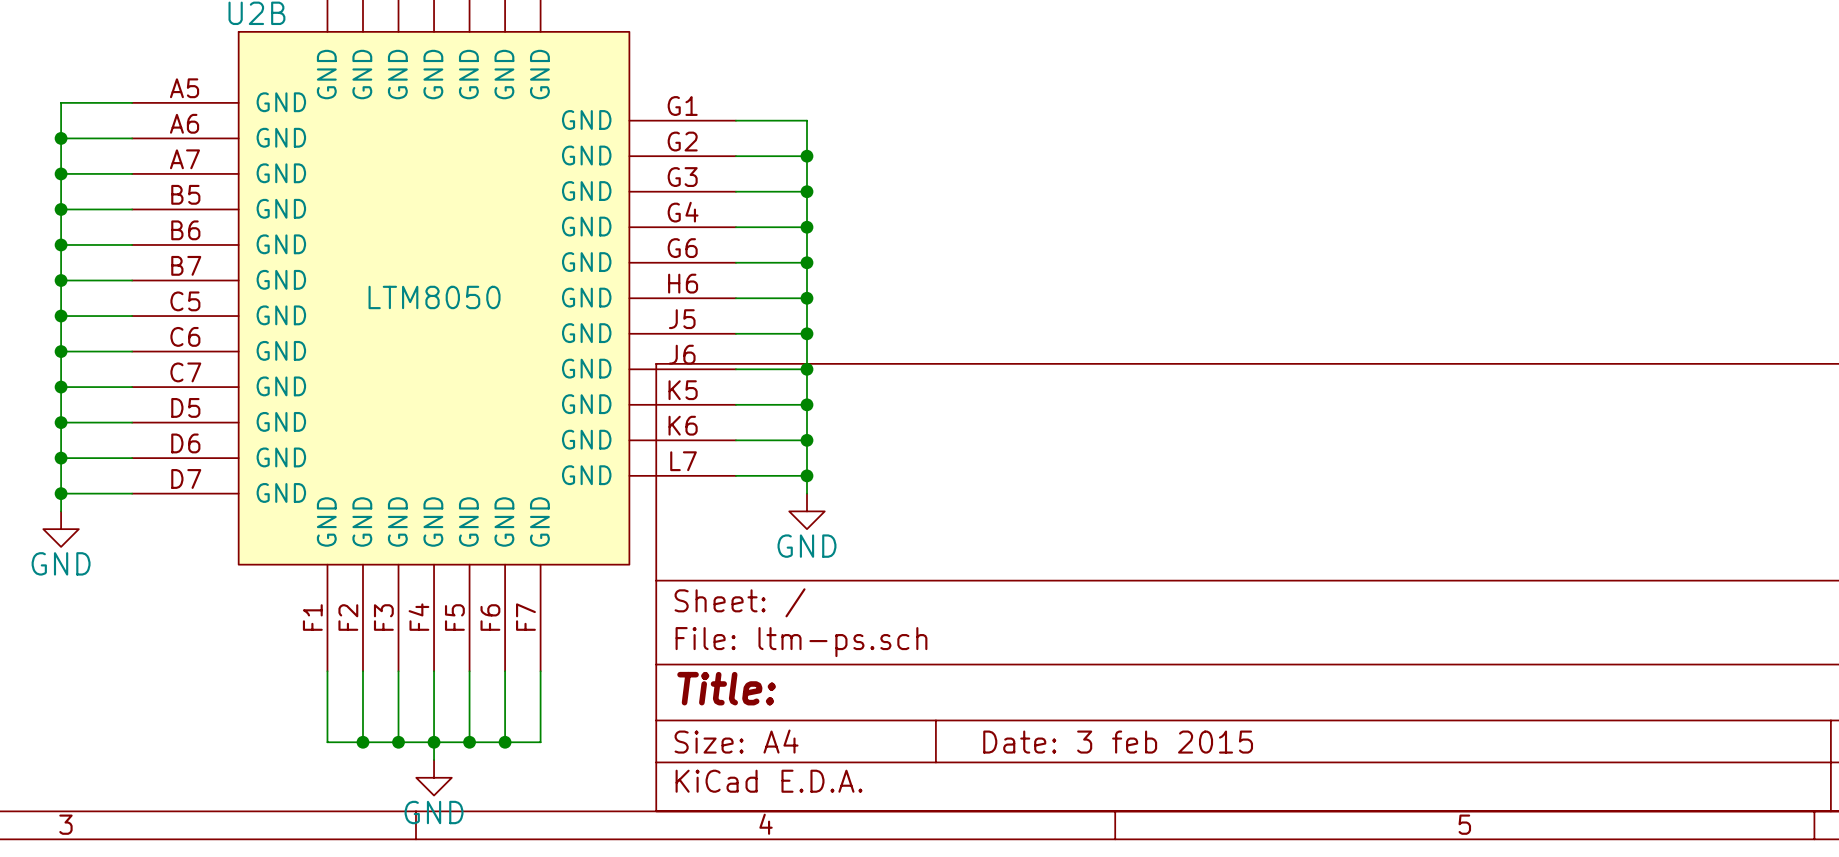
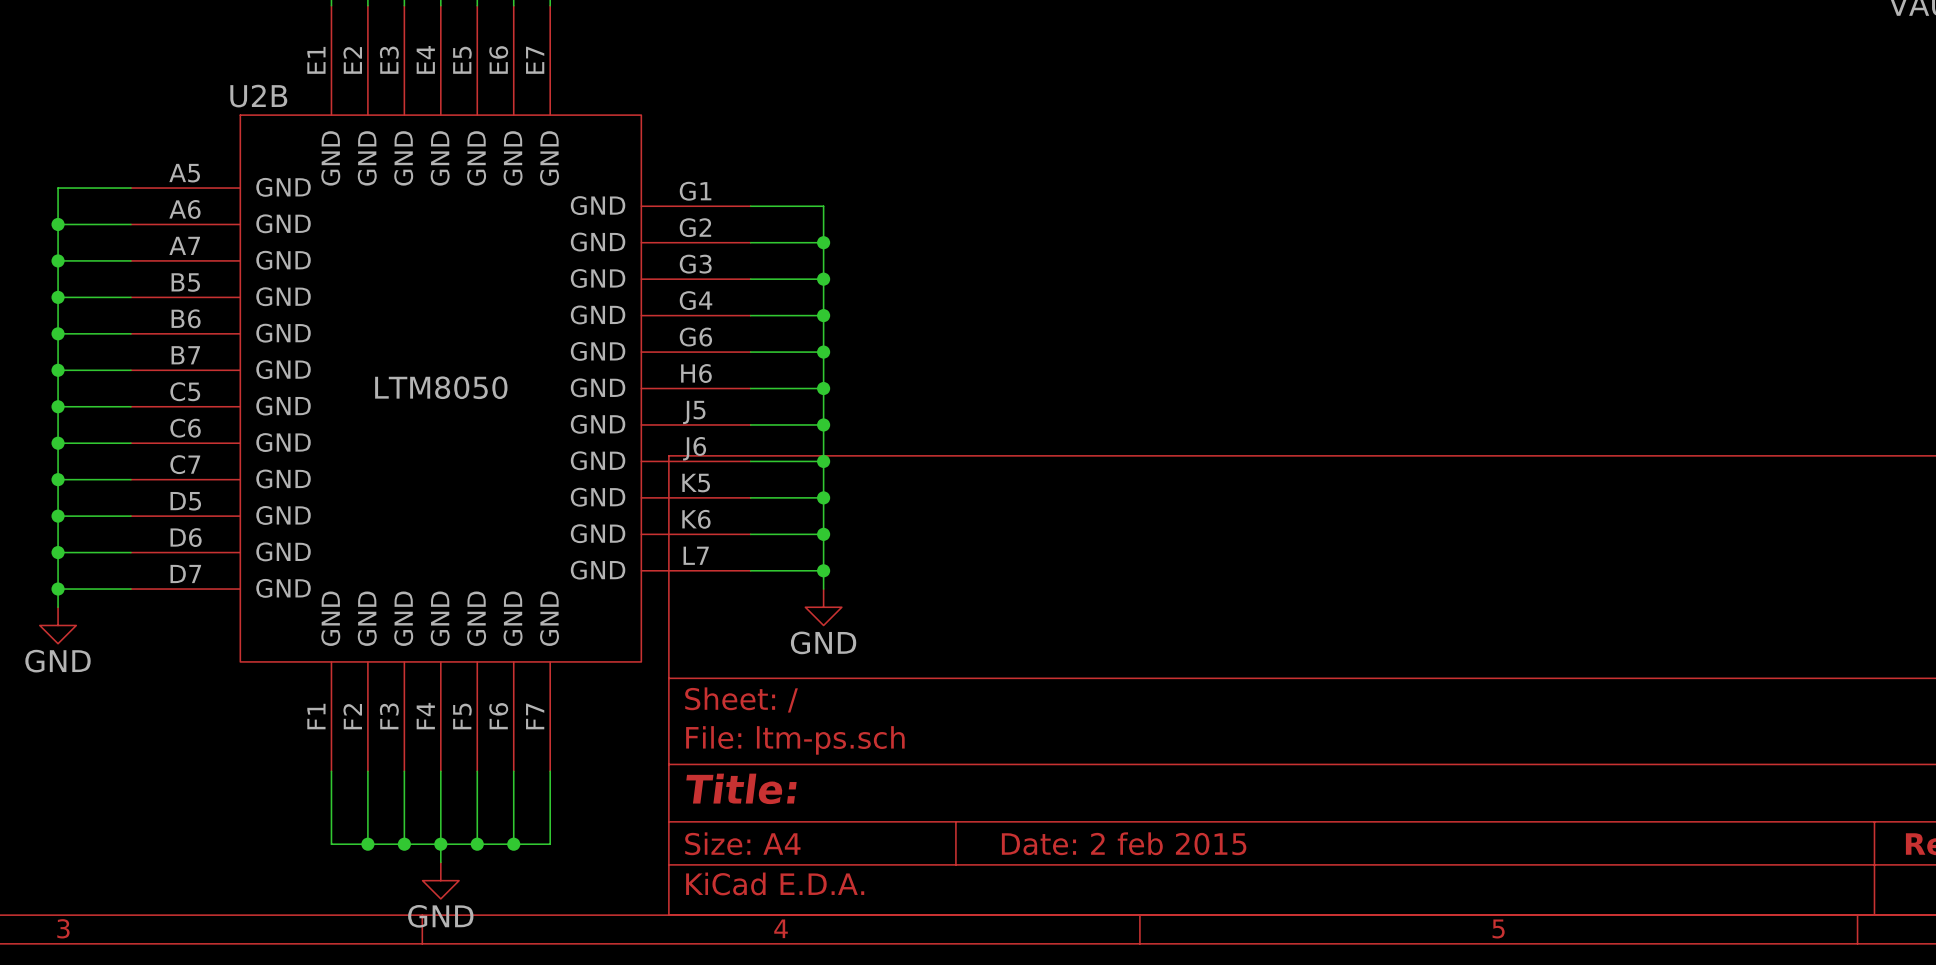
title block: Date: 3 feb 2015 (1118, 742) -> Date: 2 feb 2015 (1124, 843)

